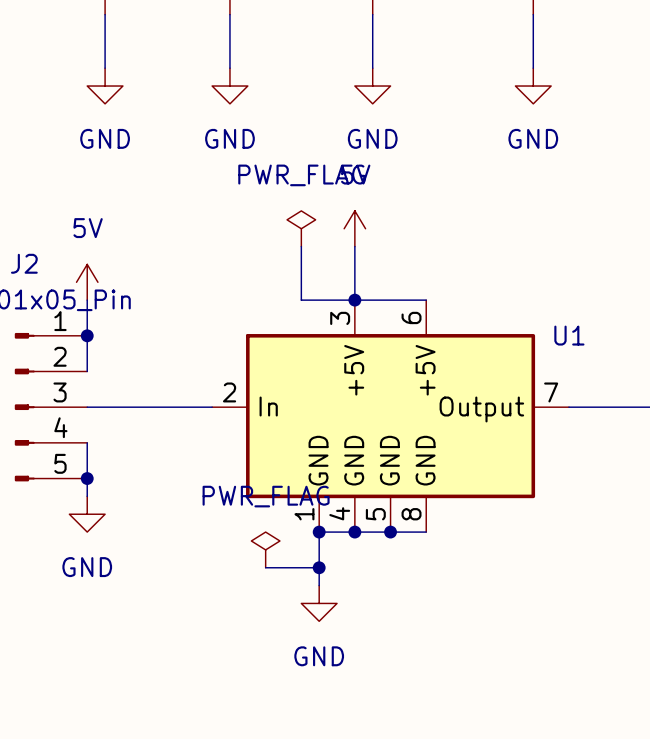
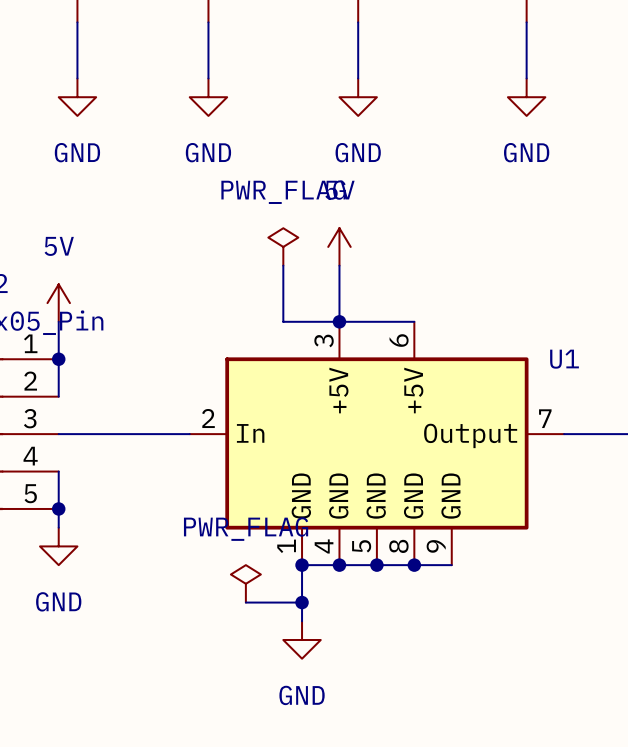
U1 symbol: [212, 300, 569, 533] -> [189, 321, 565, 566]
wire: none -> (414, 565) (451, 565)
junction: none -> (414, 565)

